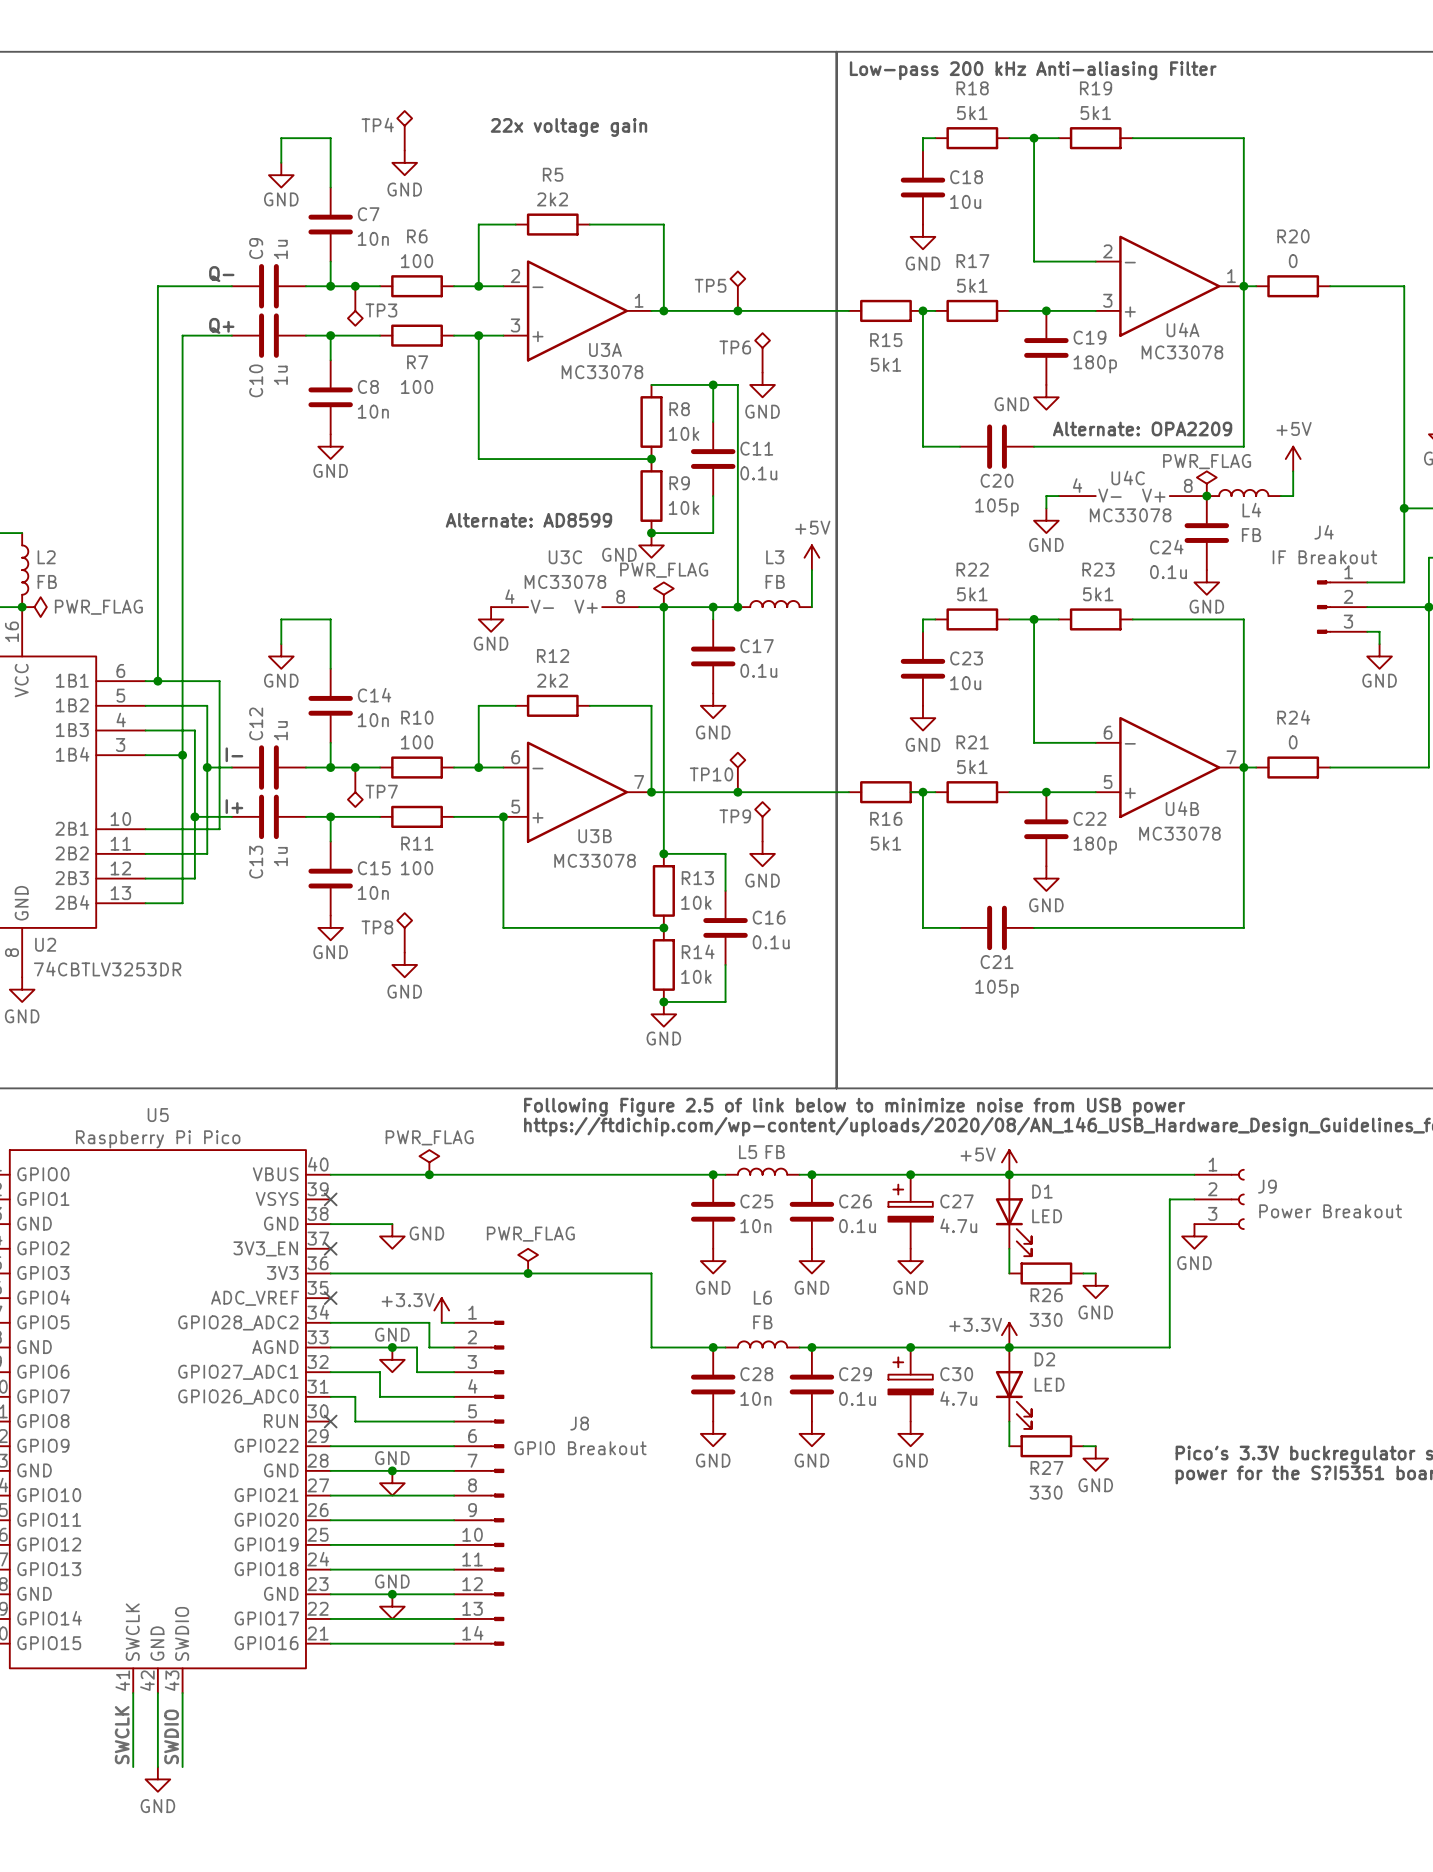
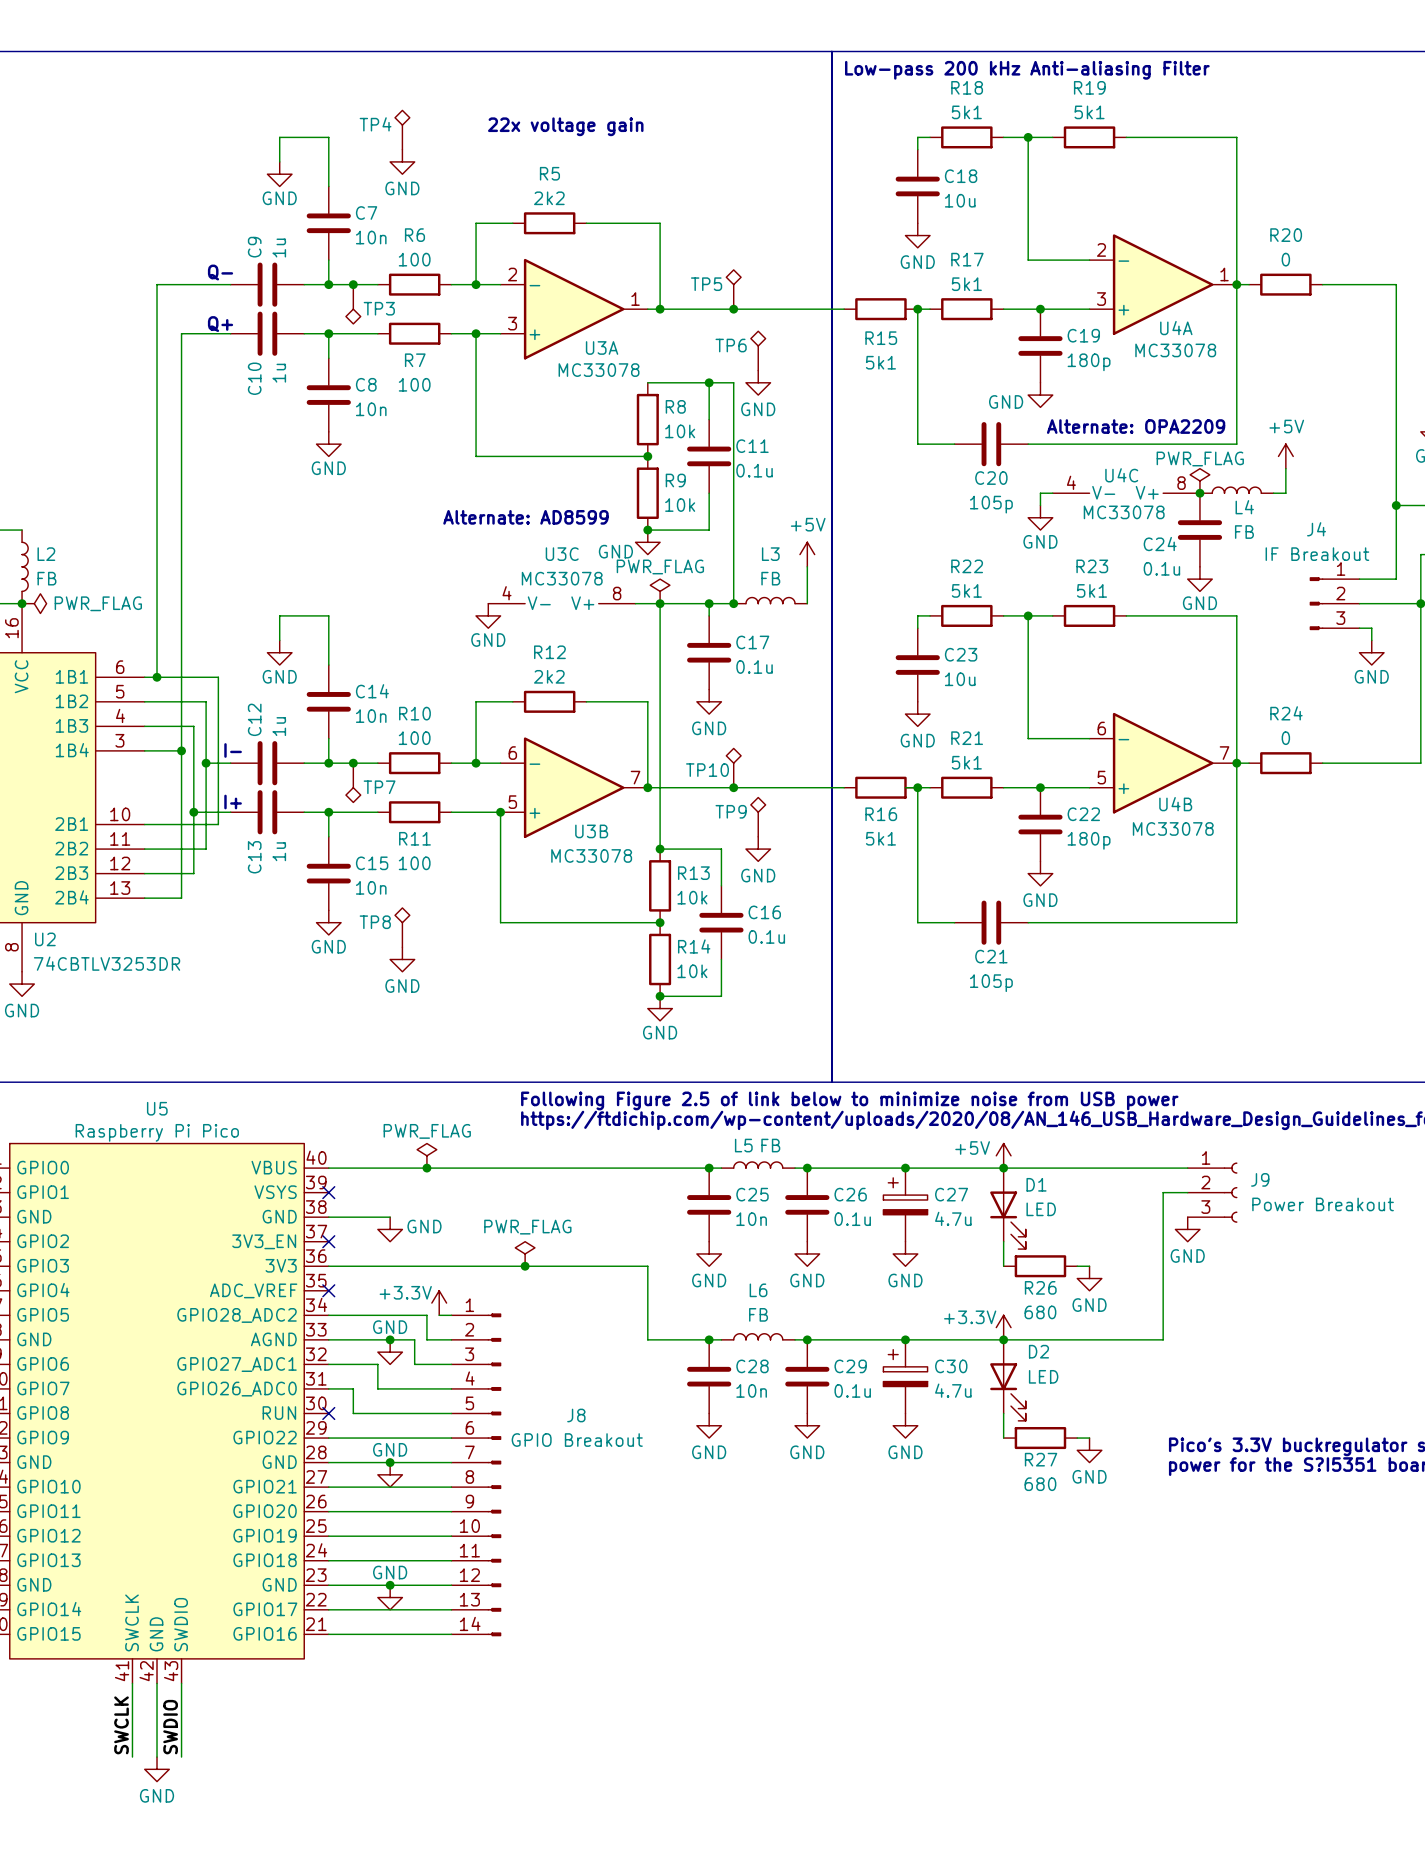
R26 value: 330 (1046, 1319) -> 680 (1040, 1312)
R27 value: 330 (1046, 1492) -> 680 (1040, 1484)

